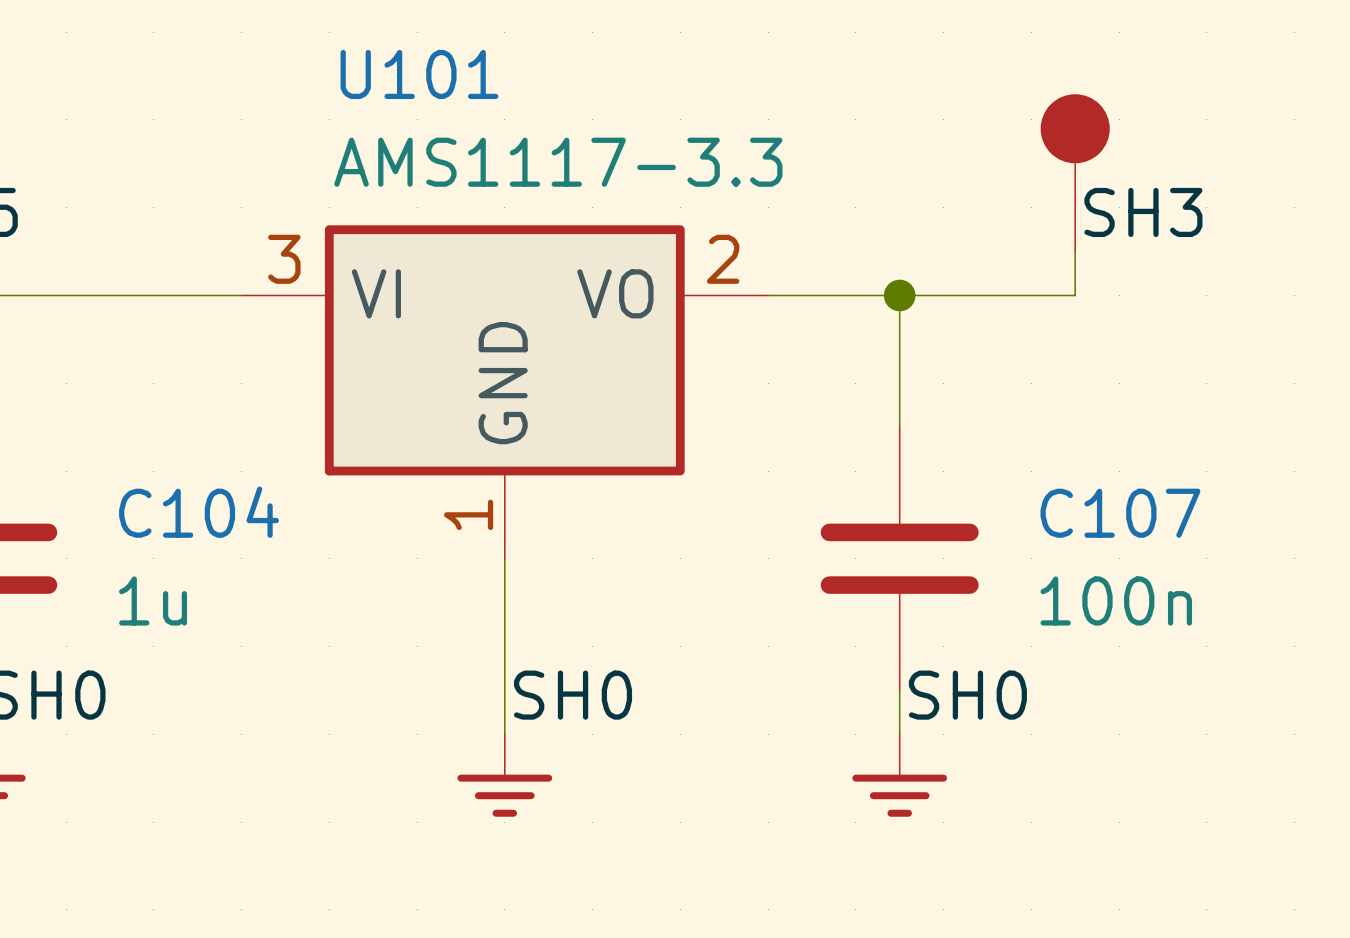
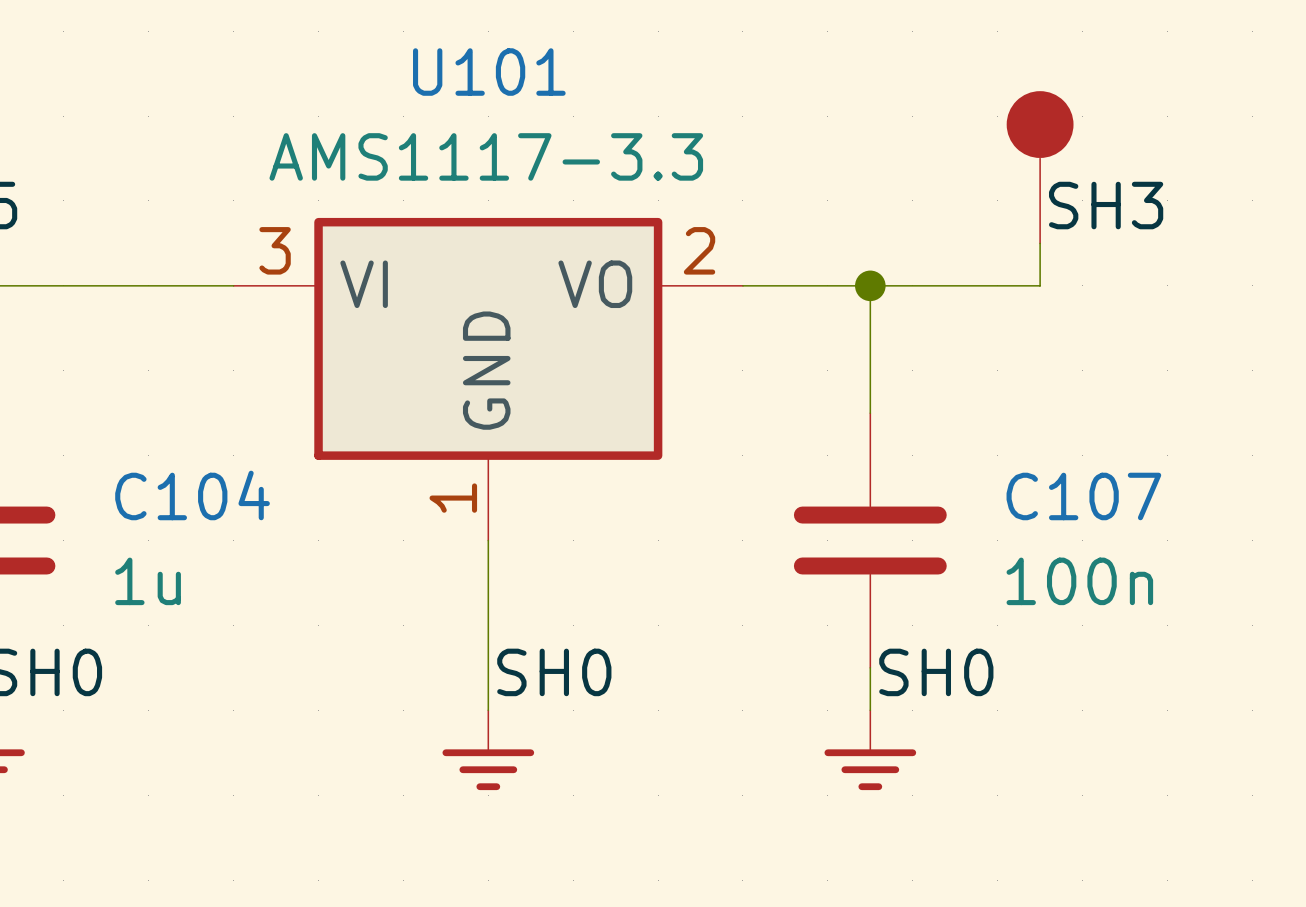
U101 name position: U101 (419, 74) -> U101 (489, 72)
U101 value position: AMS1117-3.3 (558, 162) -> AMS1117-3.3 (486, 156)

